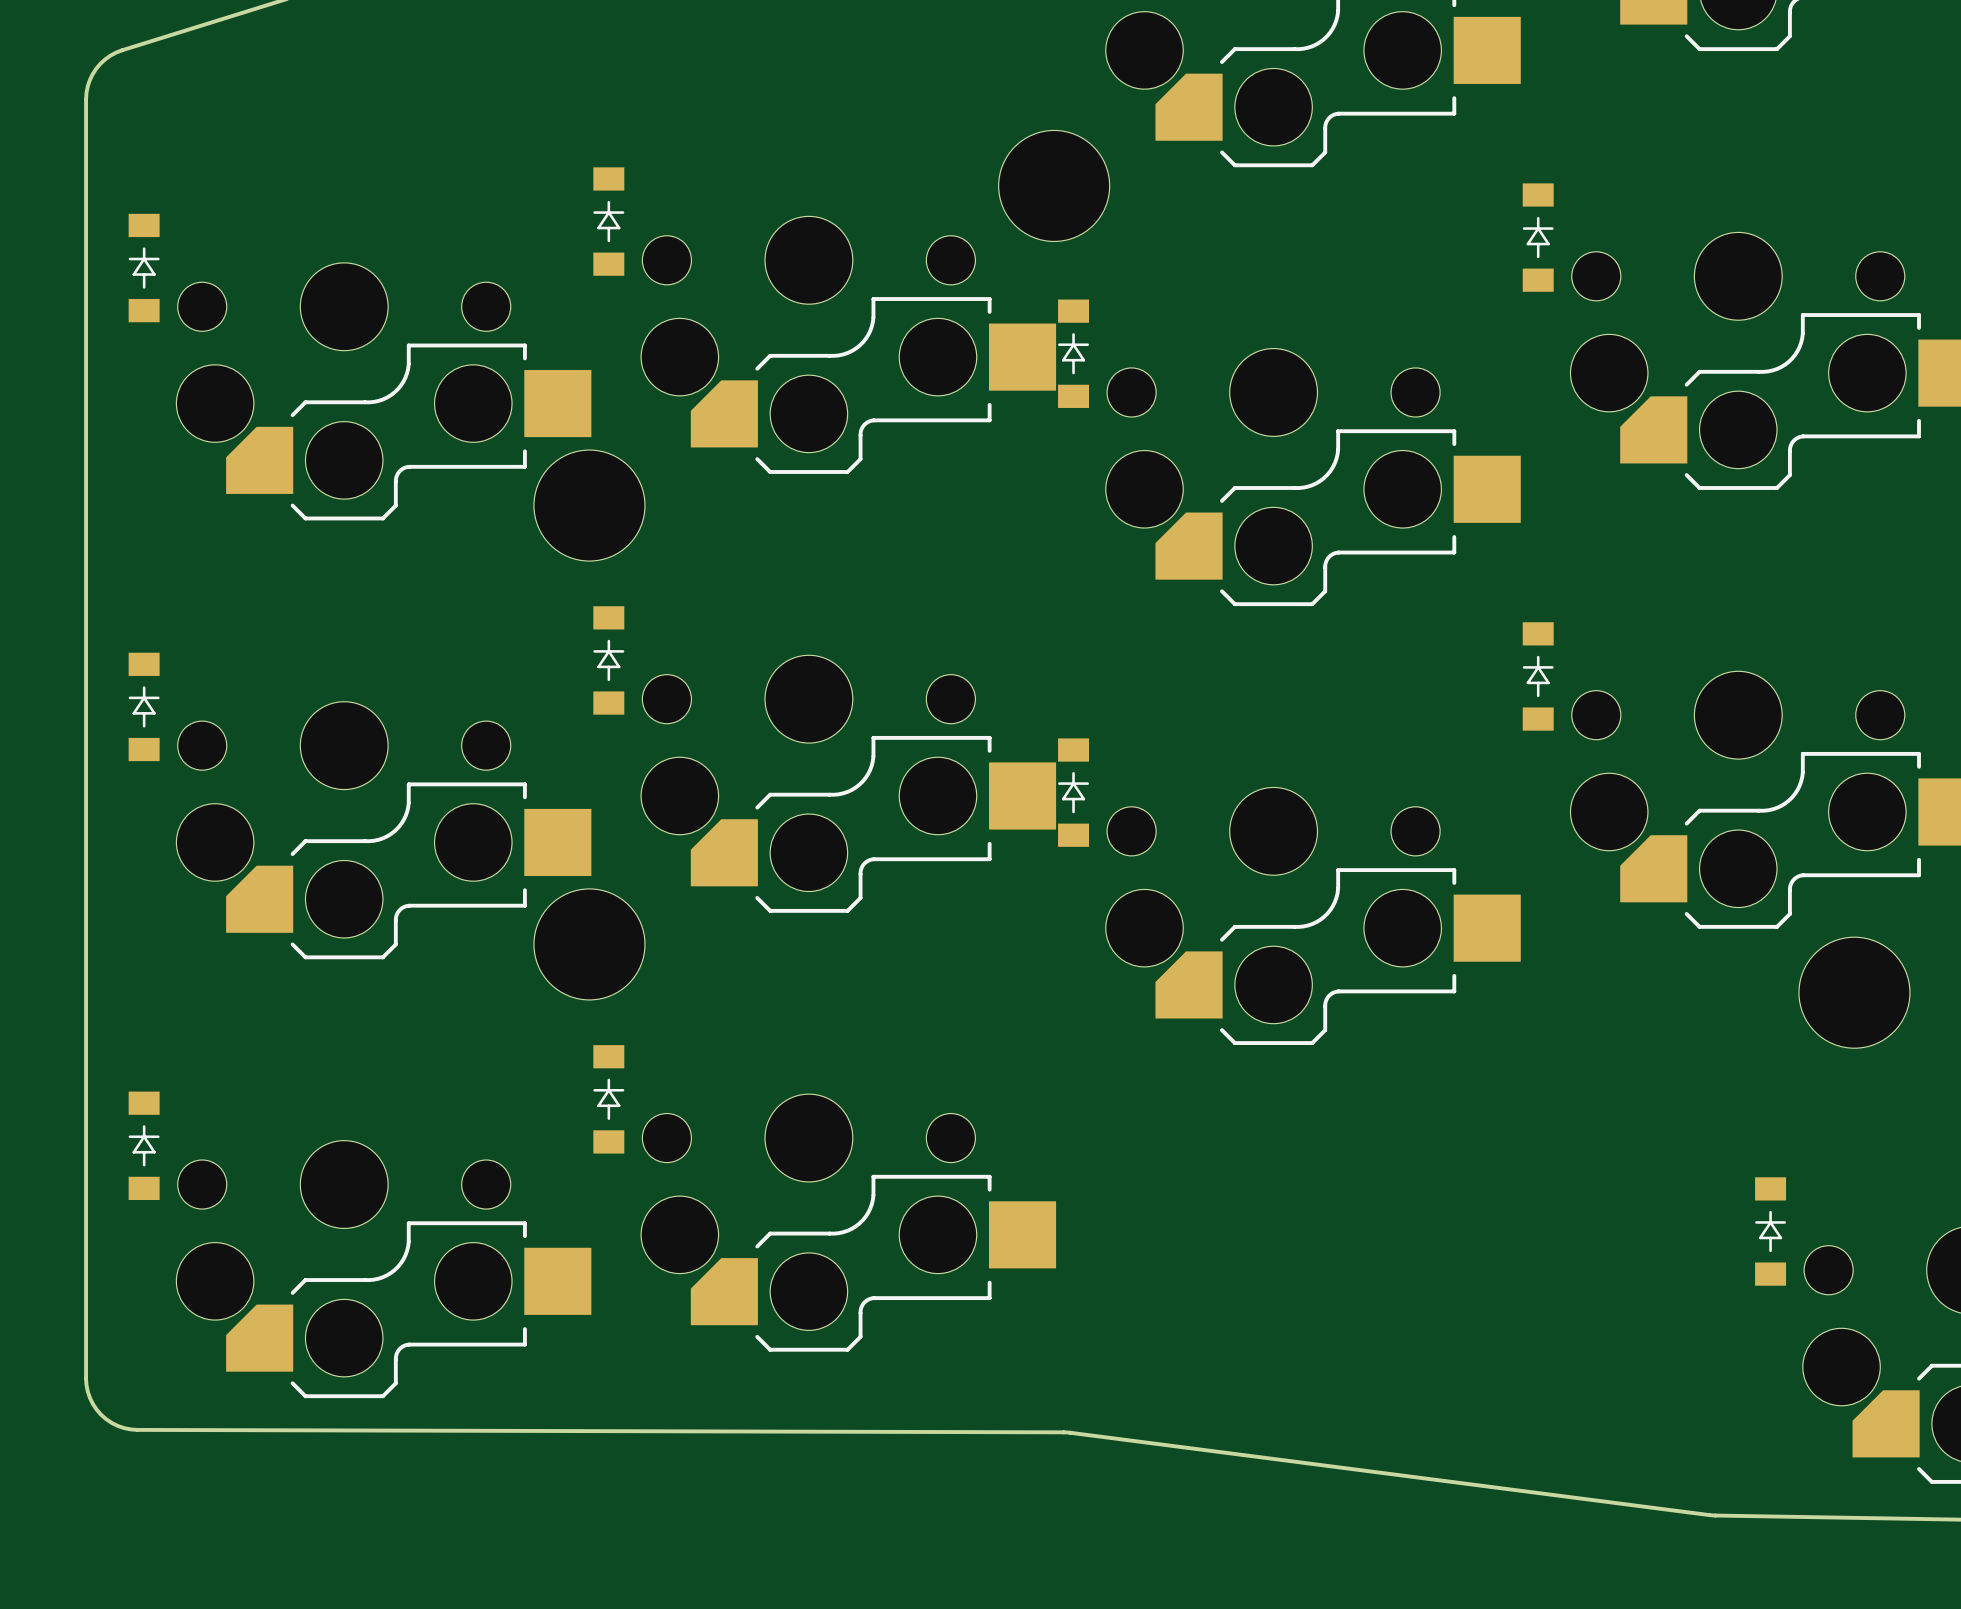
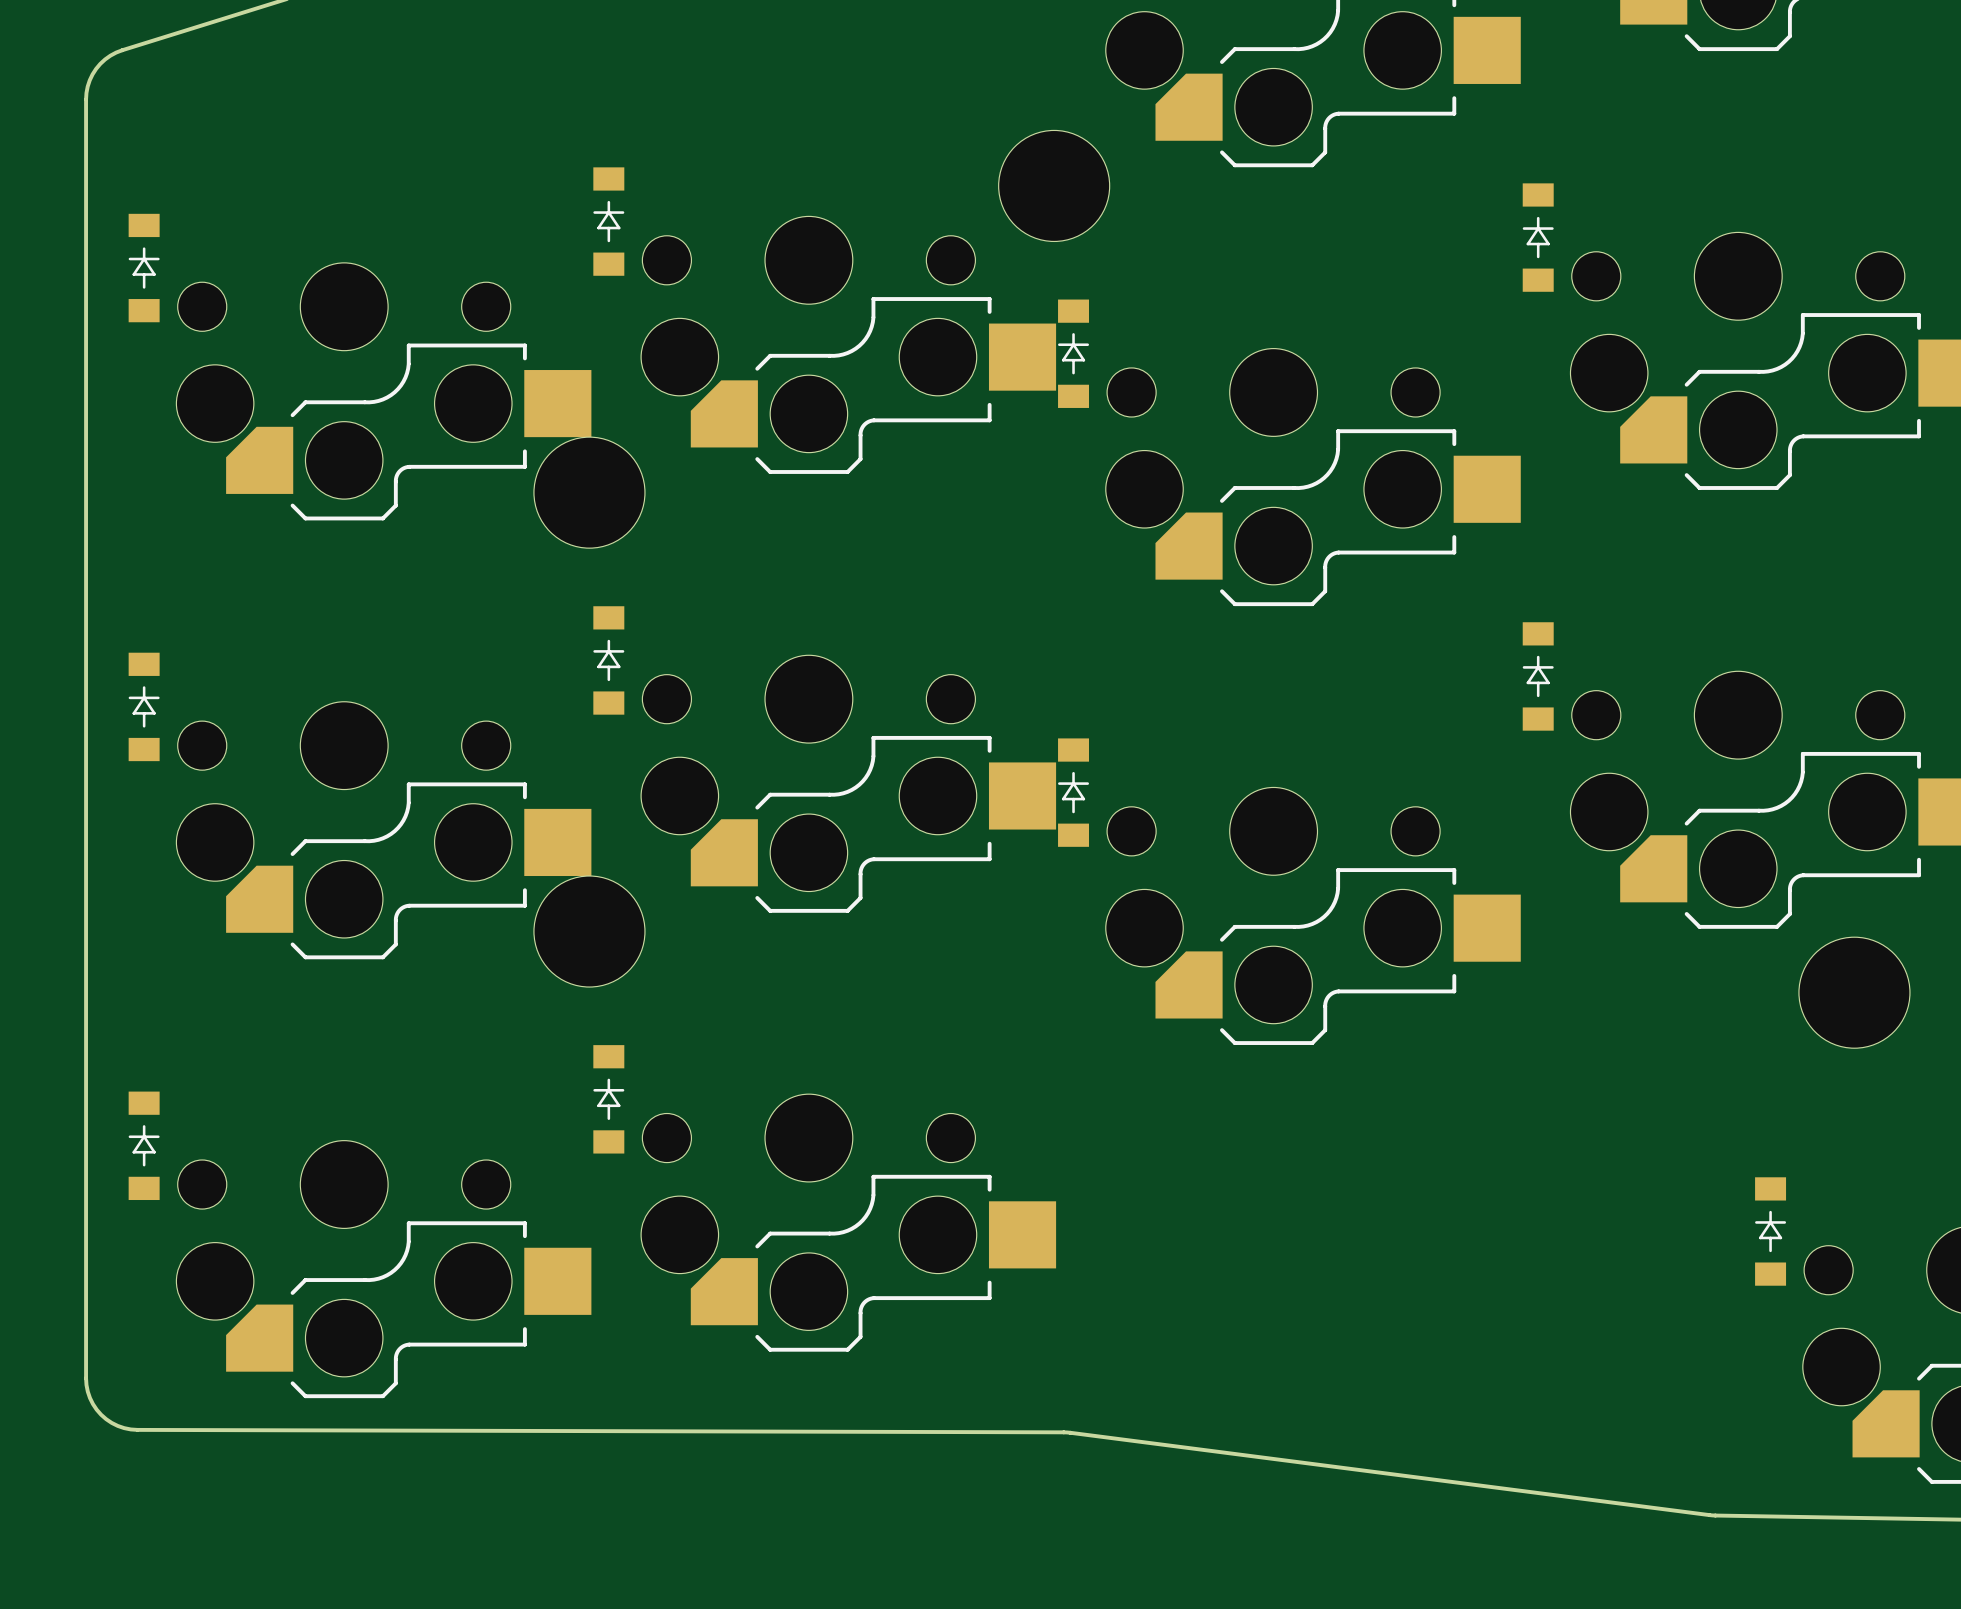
part position: (589, 505) -> (589, 492)
part position: (589, 944) -> (589, 931)

